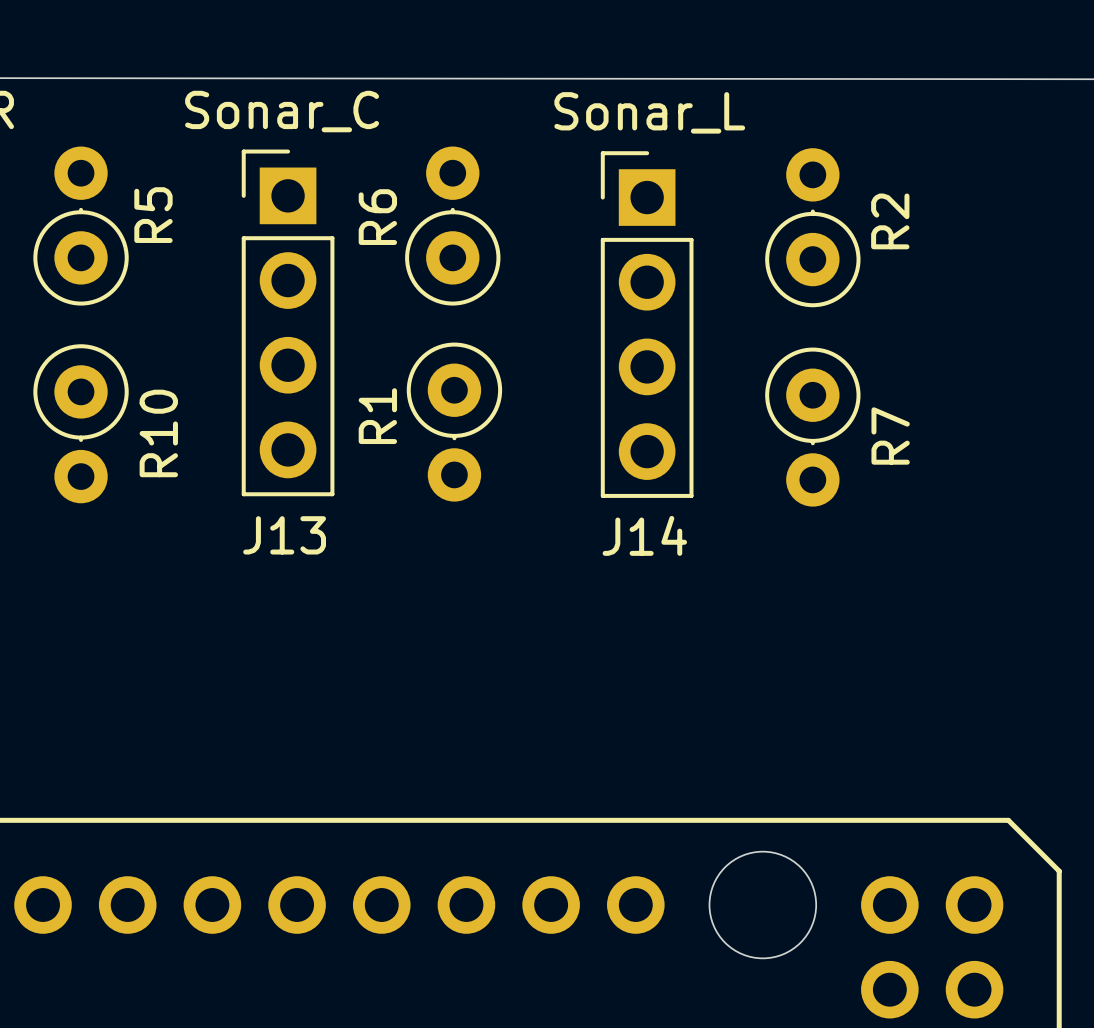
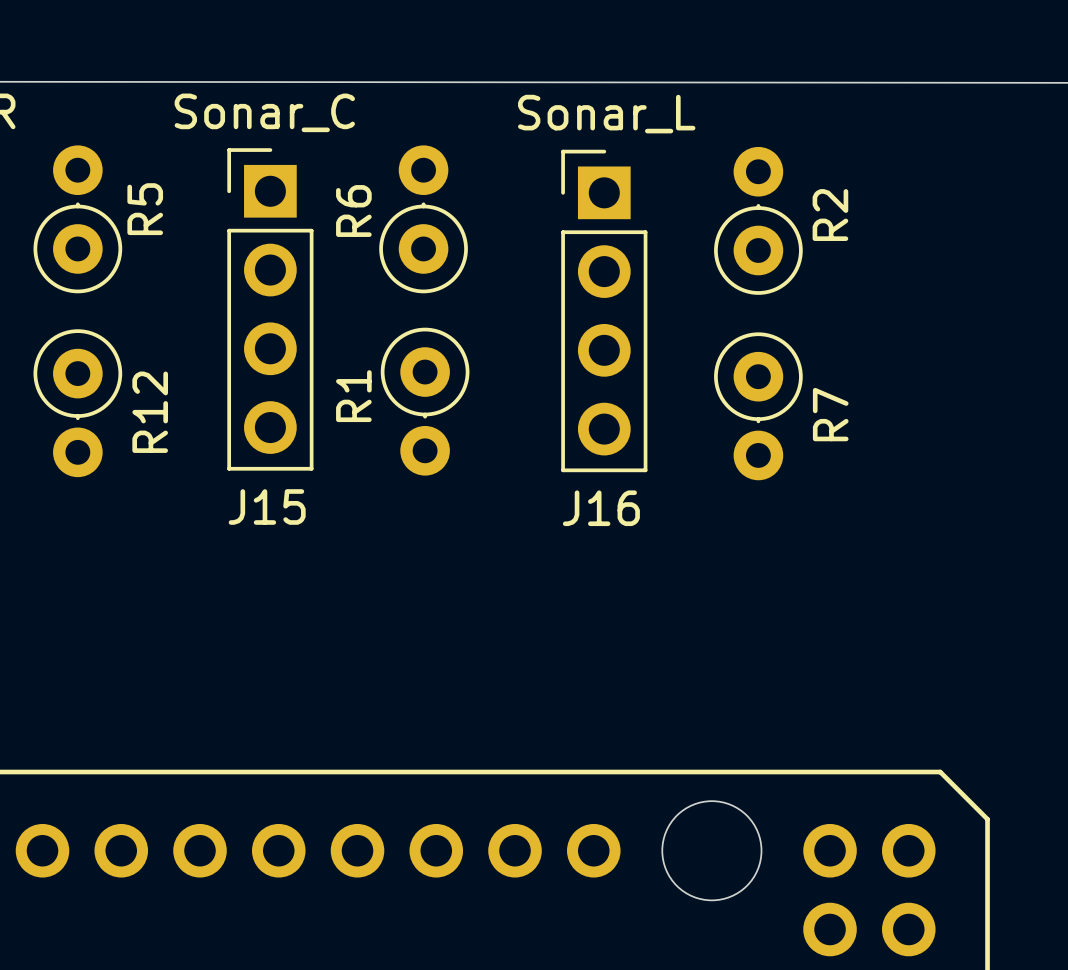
R10 name: R10 (158, 433) -> R12 (150, 412)
J13 name: J13 (284, 535) -> J15 (267, 506)
J14 name: J14 (644, 535) -> J16 (601, 508)

